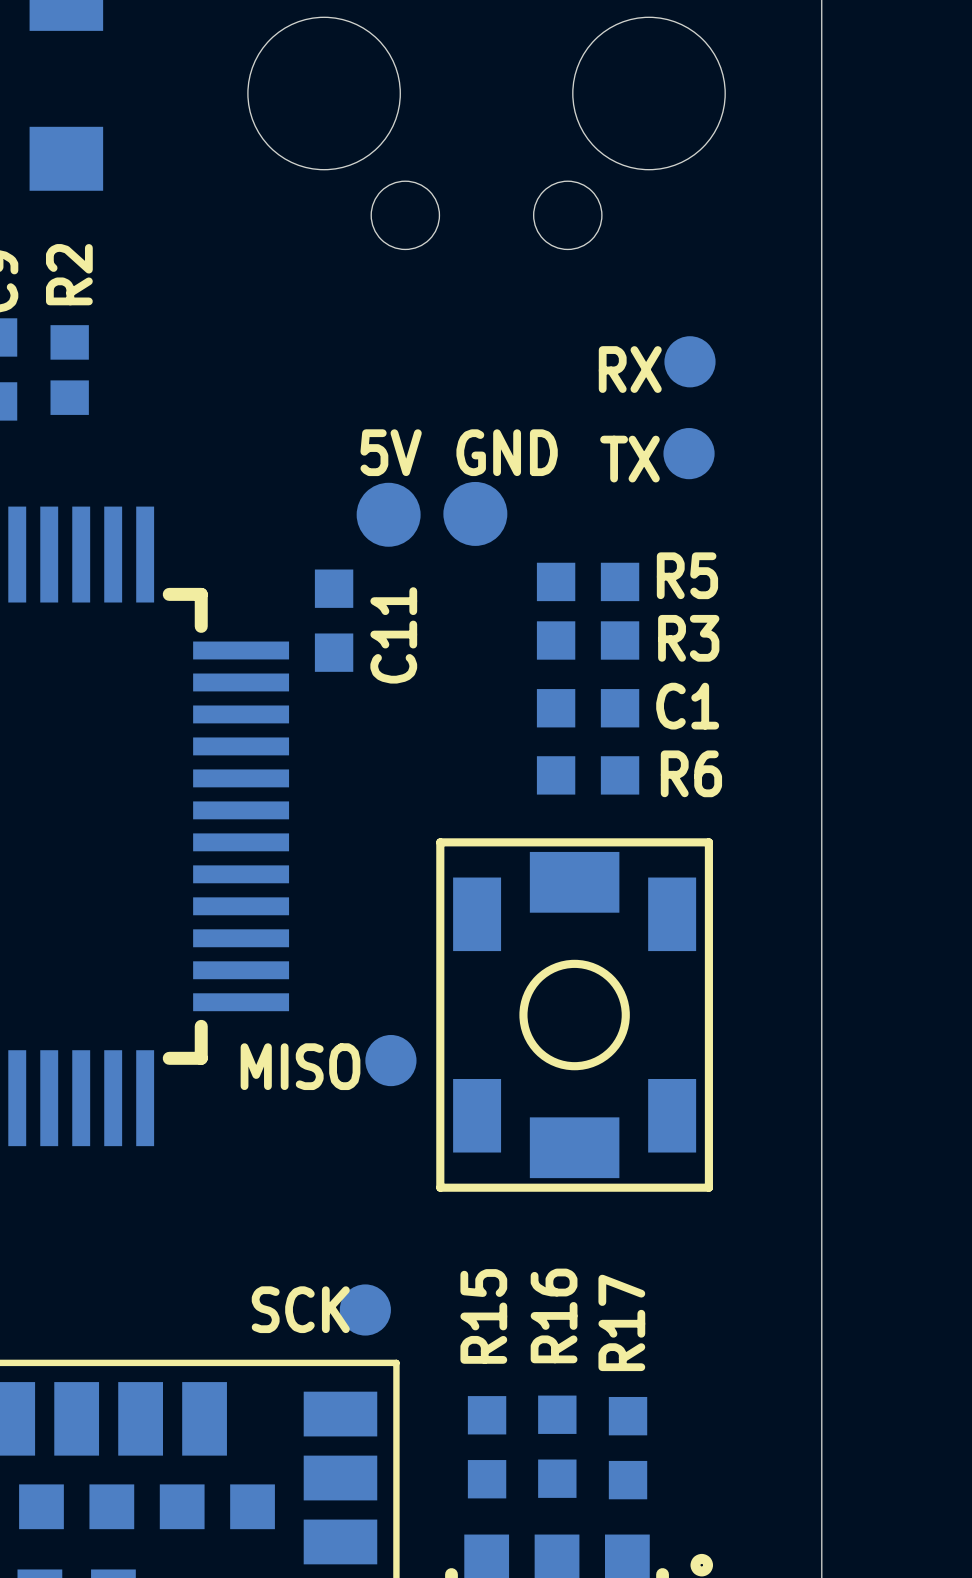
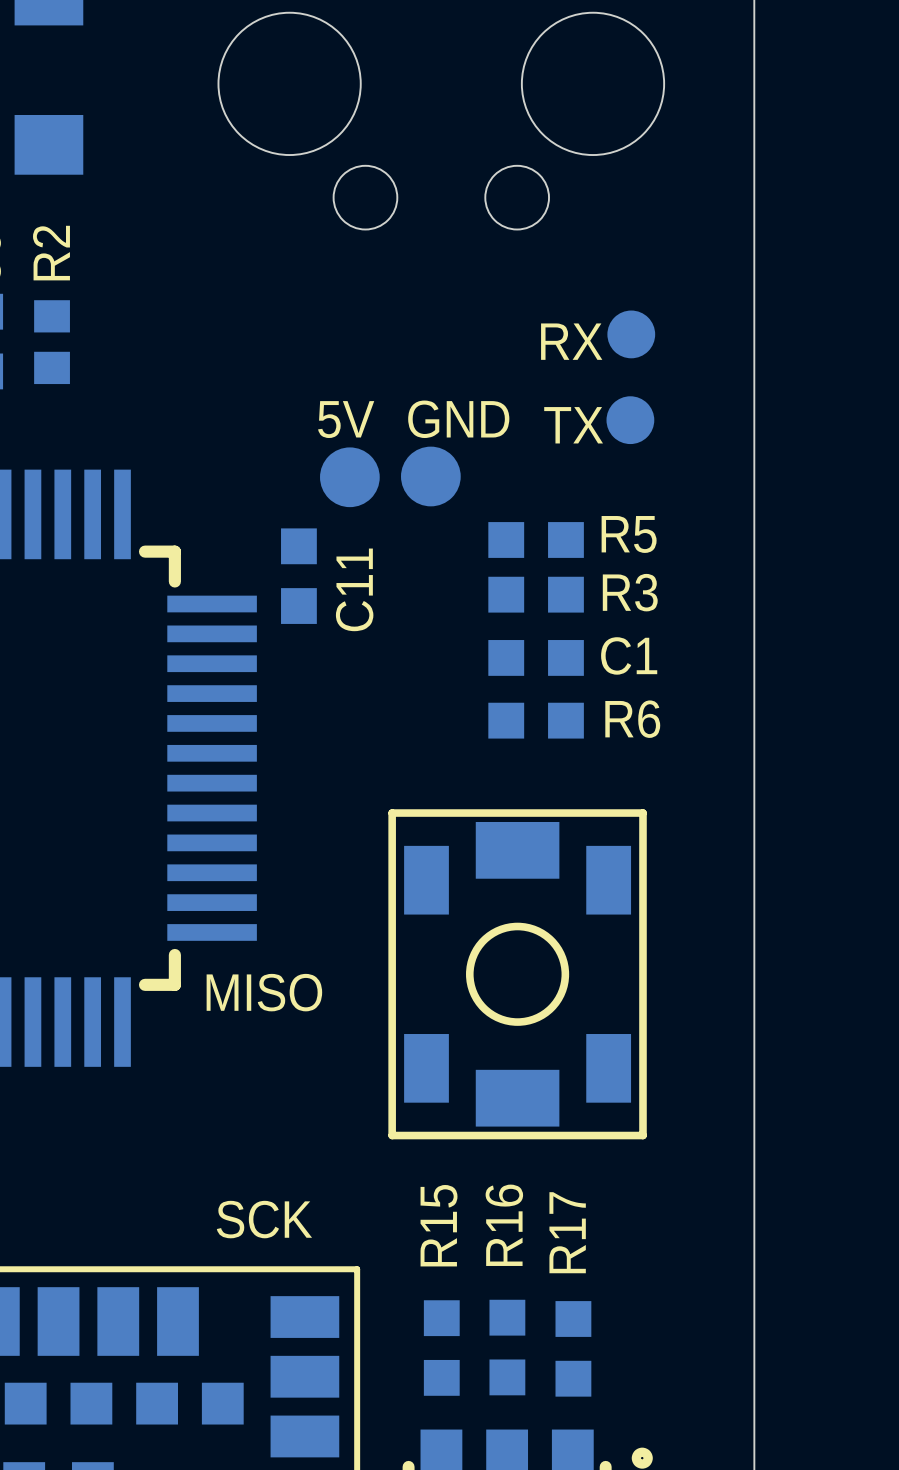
part position: (574, 1015) -> (517, 974)
part: (390, 1060) -> none
part: (365, 1309) -> none

